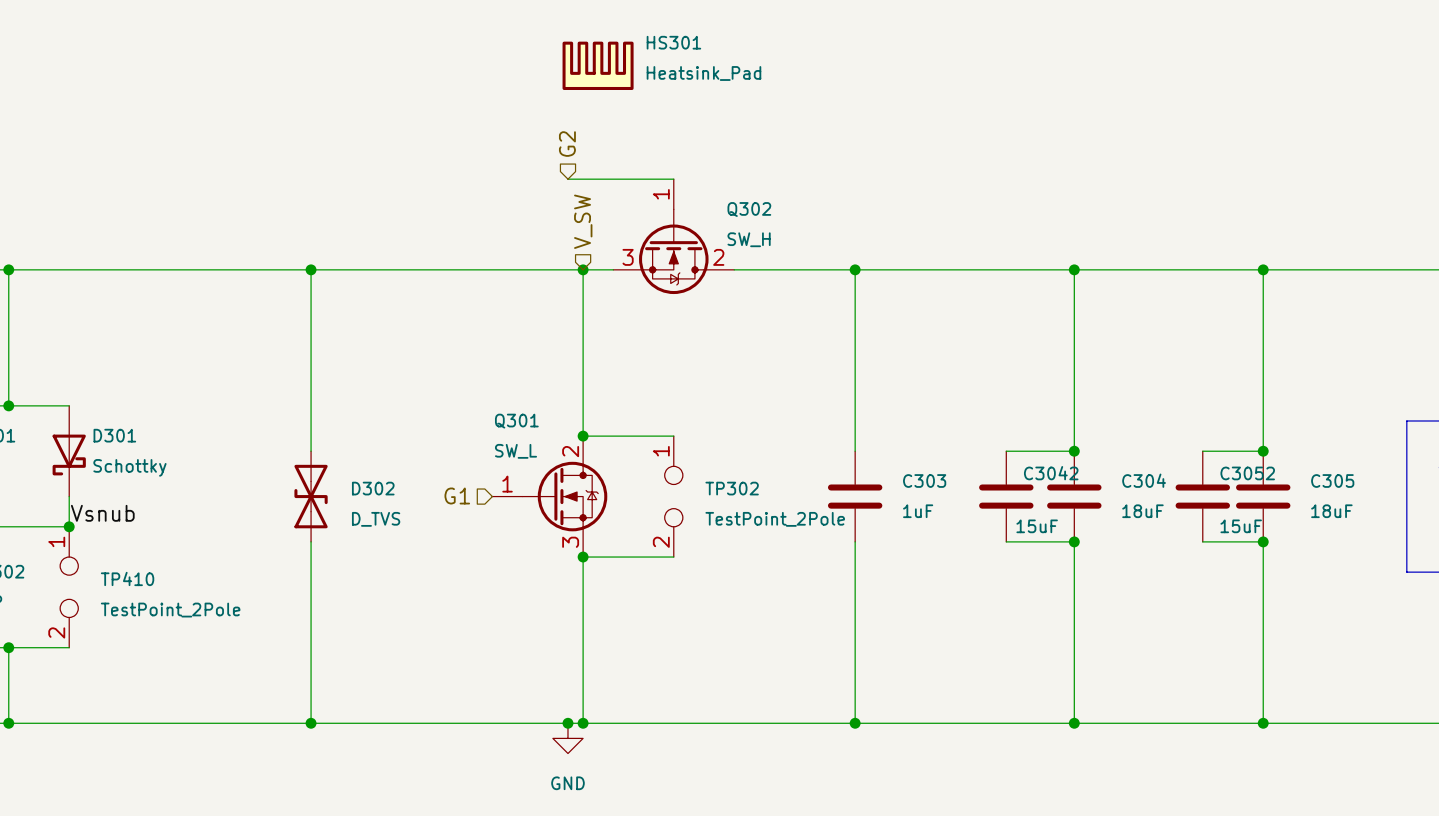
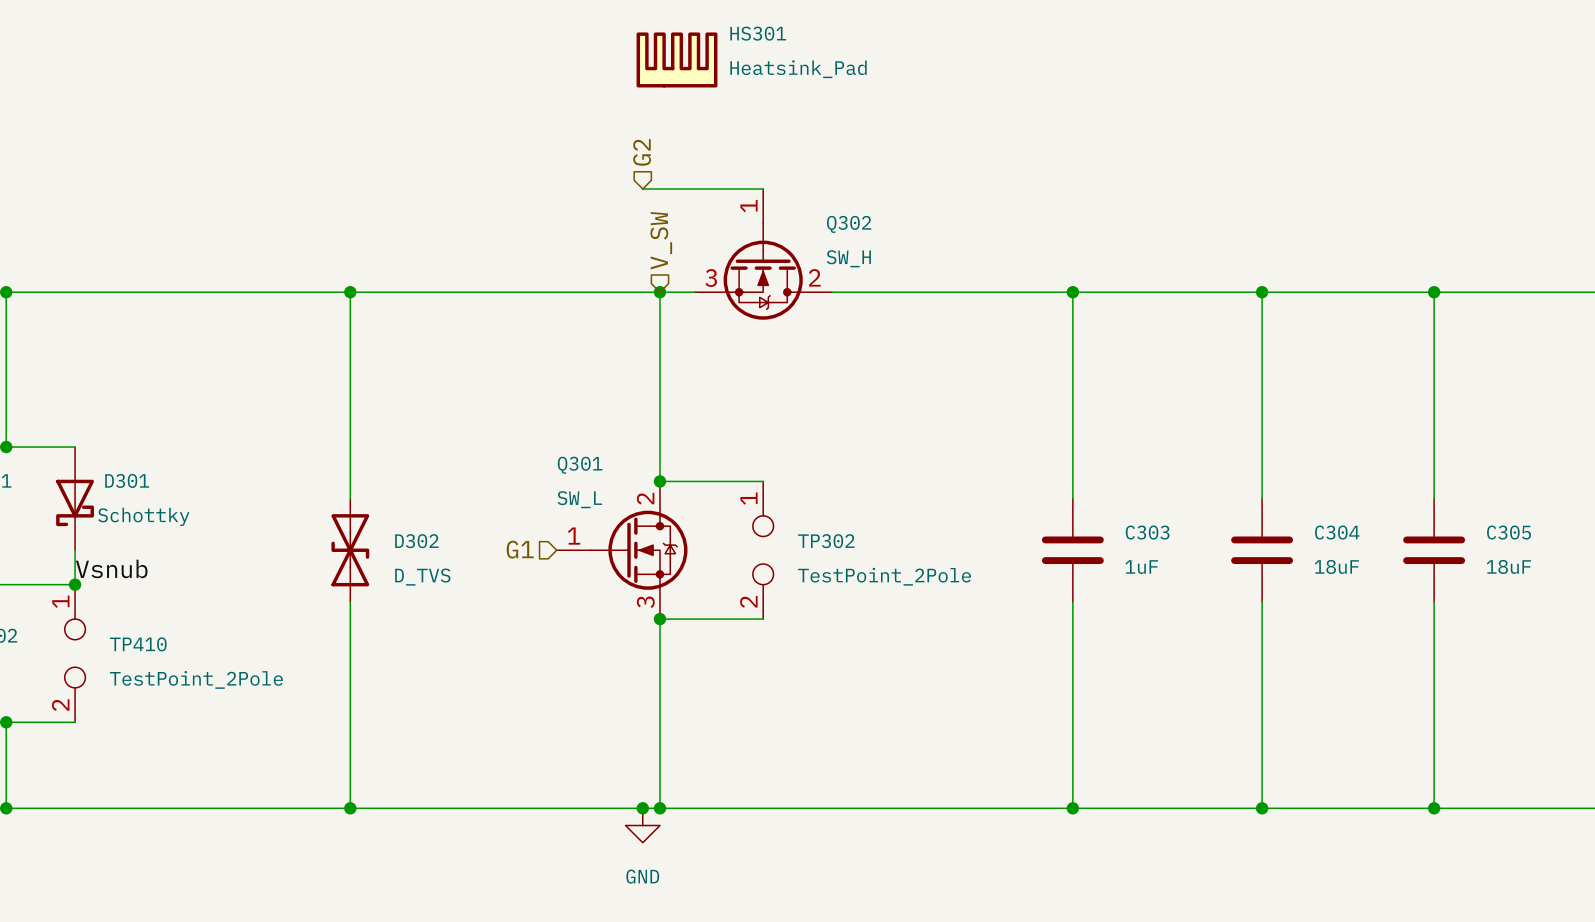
wire: (855, 269) (855, 451) -> (1072, 292) (1072, 498)
junction: (855, 269) -> none
junction: none -> (1072, 292)
wire: (1074, 269) (1074, 451) (1006, 451) -> none
junction position: (1074, 269) -> (1262, 292)
wire: none -> (1262, 292) (1262, 498)
junction: (1074, 451) -> none
wire: (1202, 451) (1263, 451) -> none
junction: (1263, 451) -> none
C303 position: (855, 496) -> (1072, 550)
C3042: 15uF (1006, 496) -> none
C304 position: (1074, 496) -> (1262, 550)
C3052: 15uF (1202, 496) -> none
wire: (855, 541) (855, 723) -> (1072, 601) (1072, 808)
wire: (1006, 541) (1074, 541) (1074, 723) -> none
junction: (1074, 541) -> none
wire: none -> (1262, 601) (1262, 808)
wire: (1202, 541) (1263, 541) -> none
junction: (1263, 541) -> none
junction: (855, 723) -> none
junction: none -> (1072, 808)
junction position: (1074, 723) -> (1262, 808)

